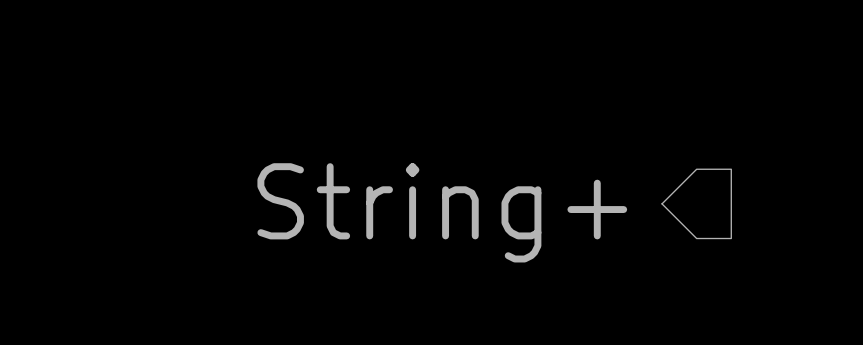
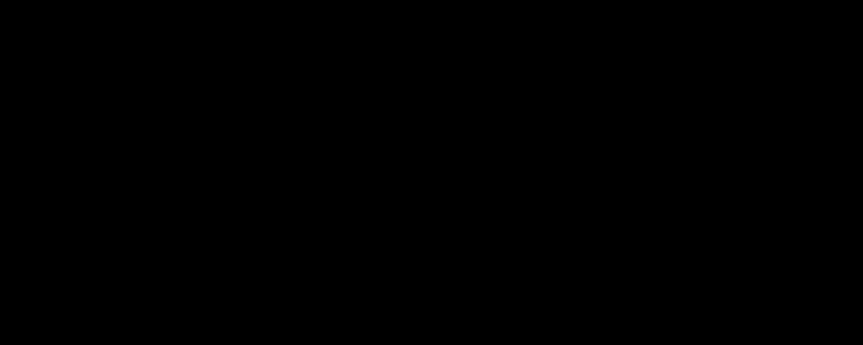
hierarchical label: String+ (442, 212) -> none

